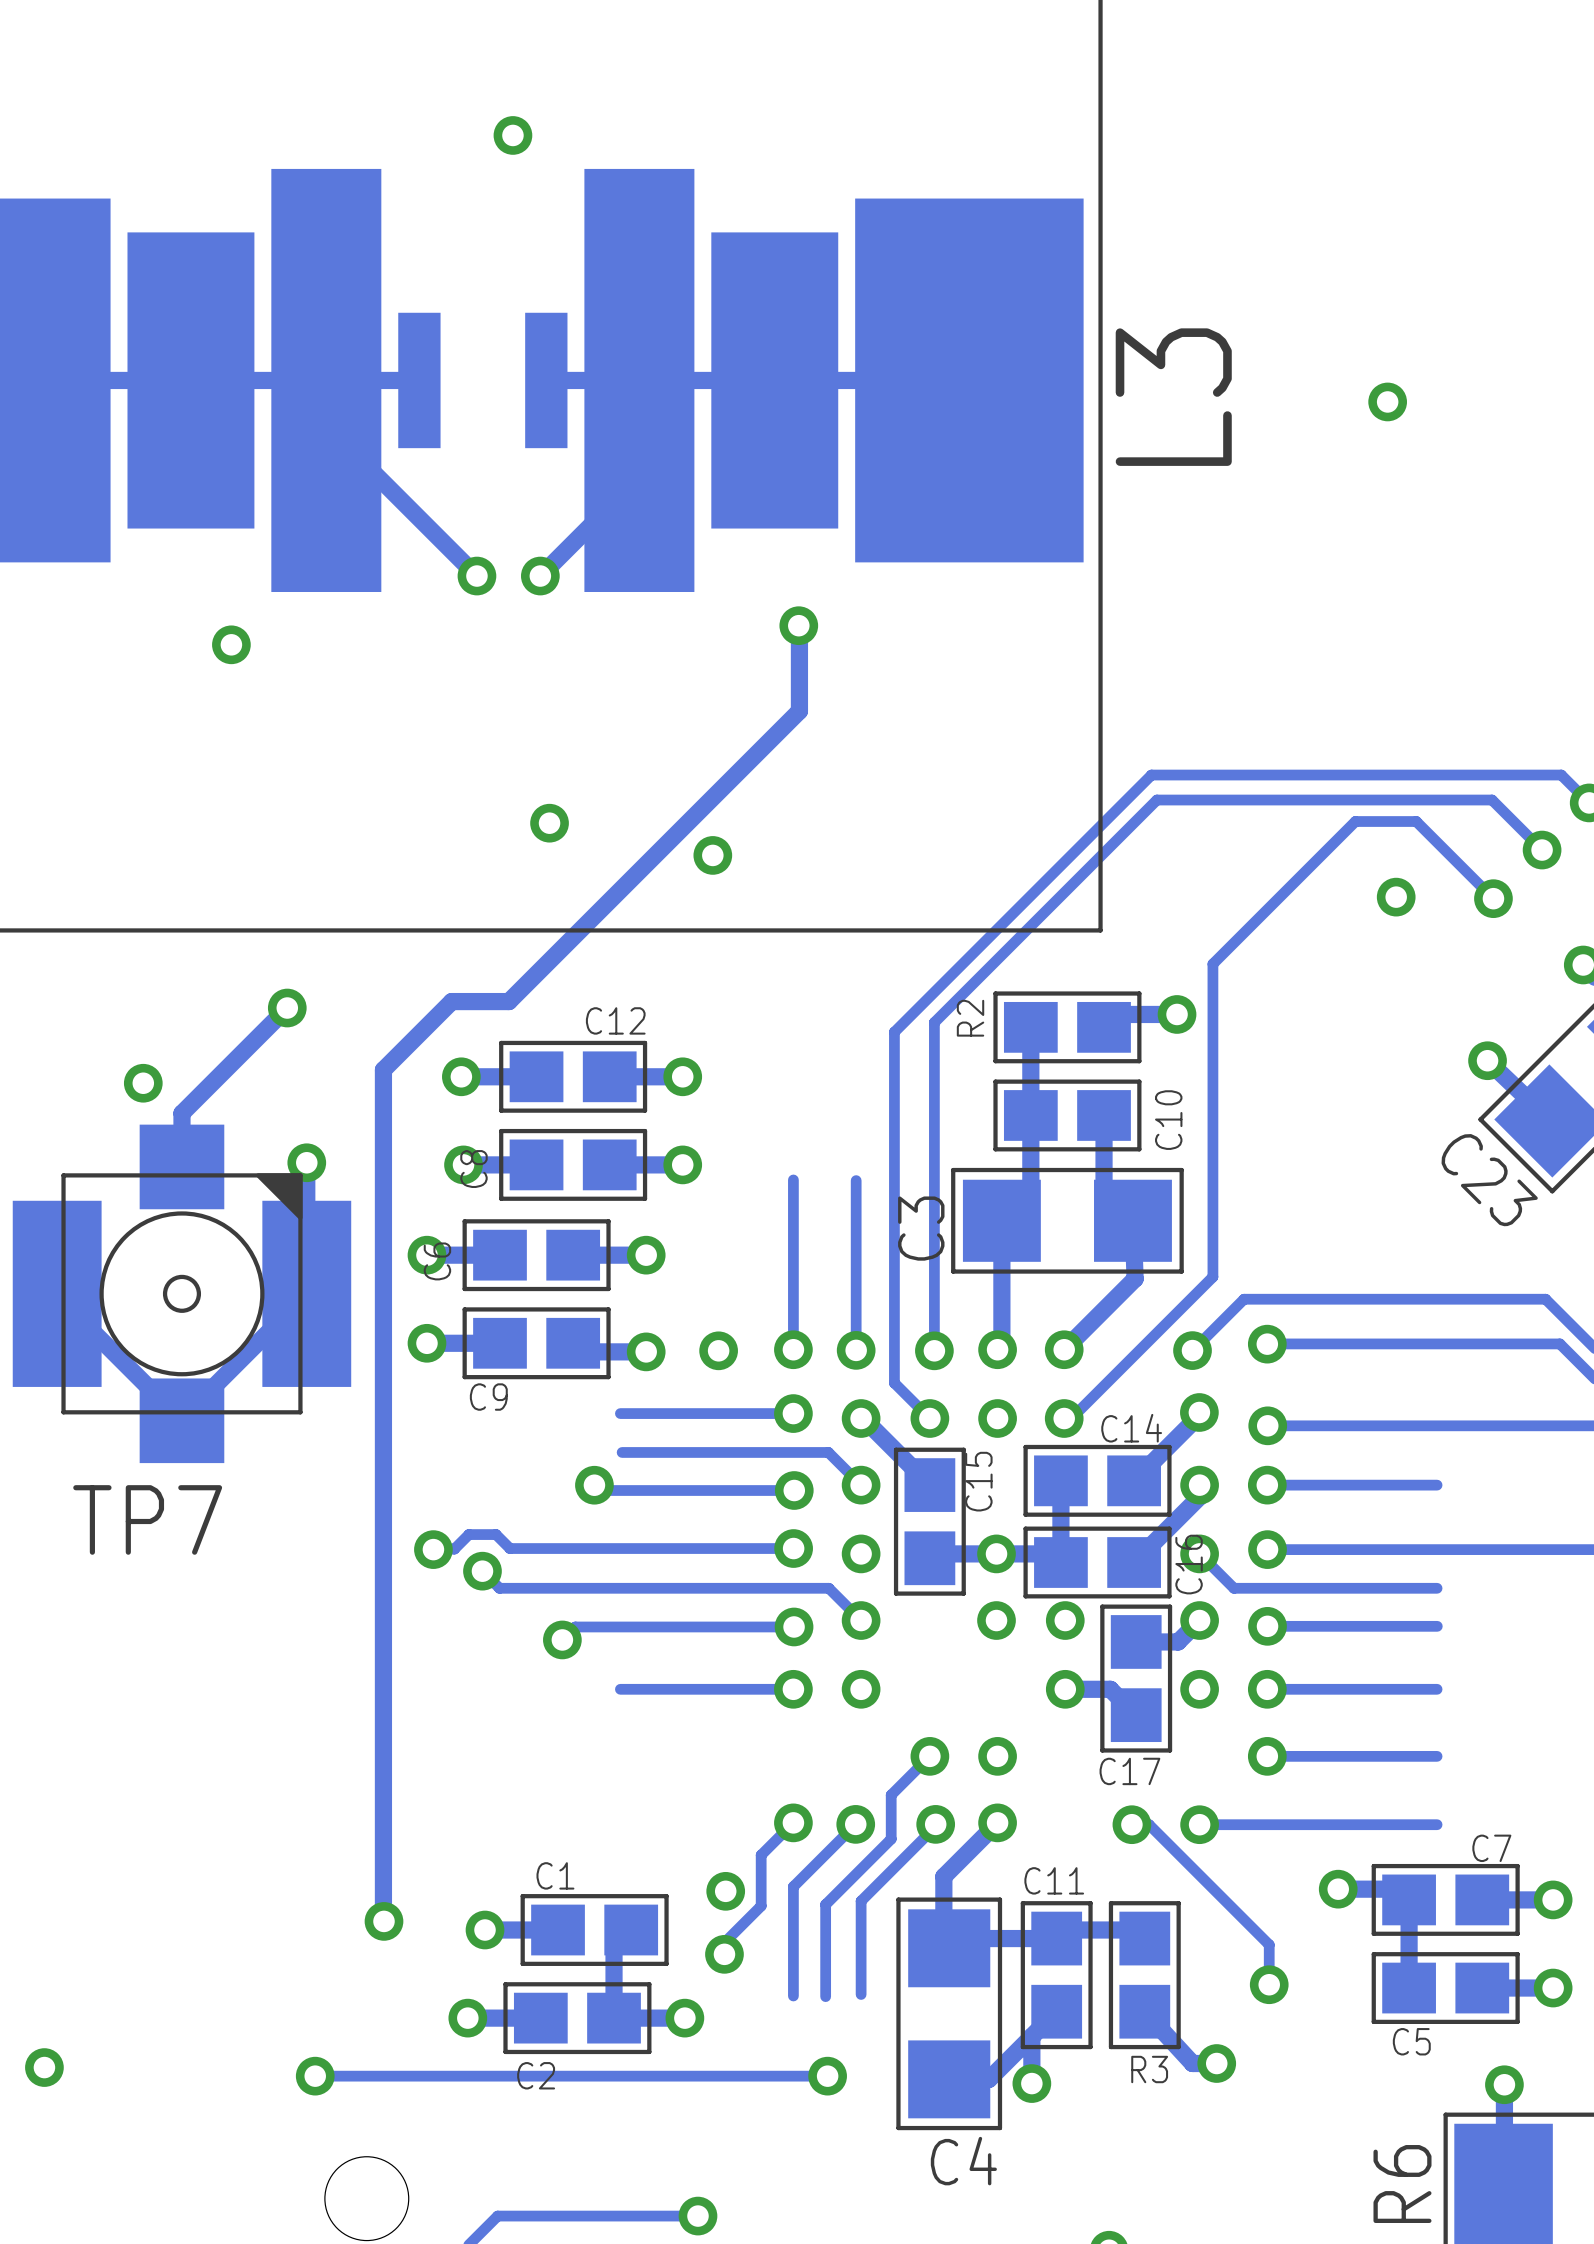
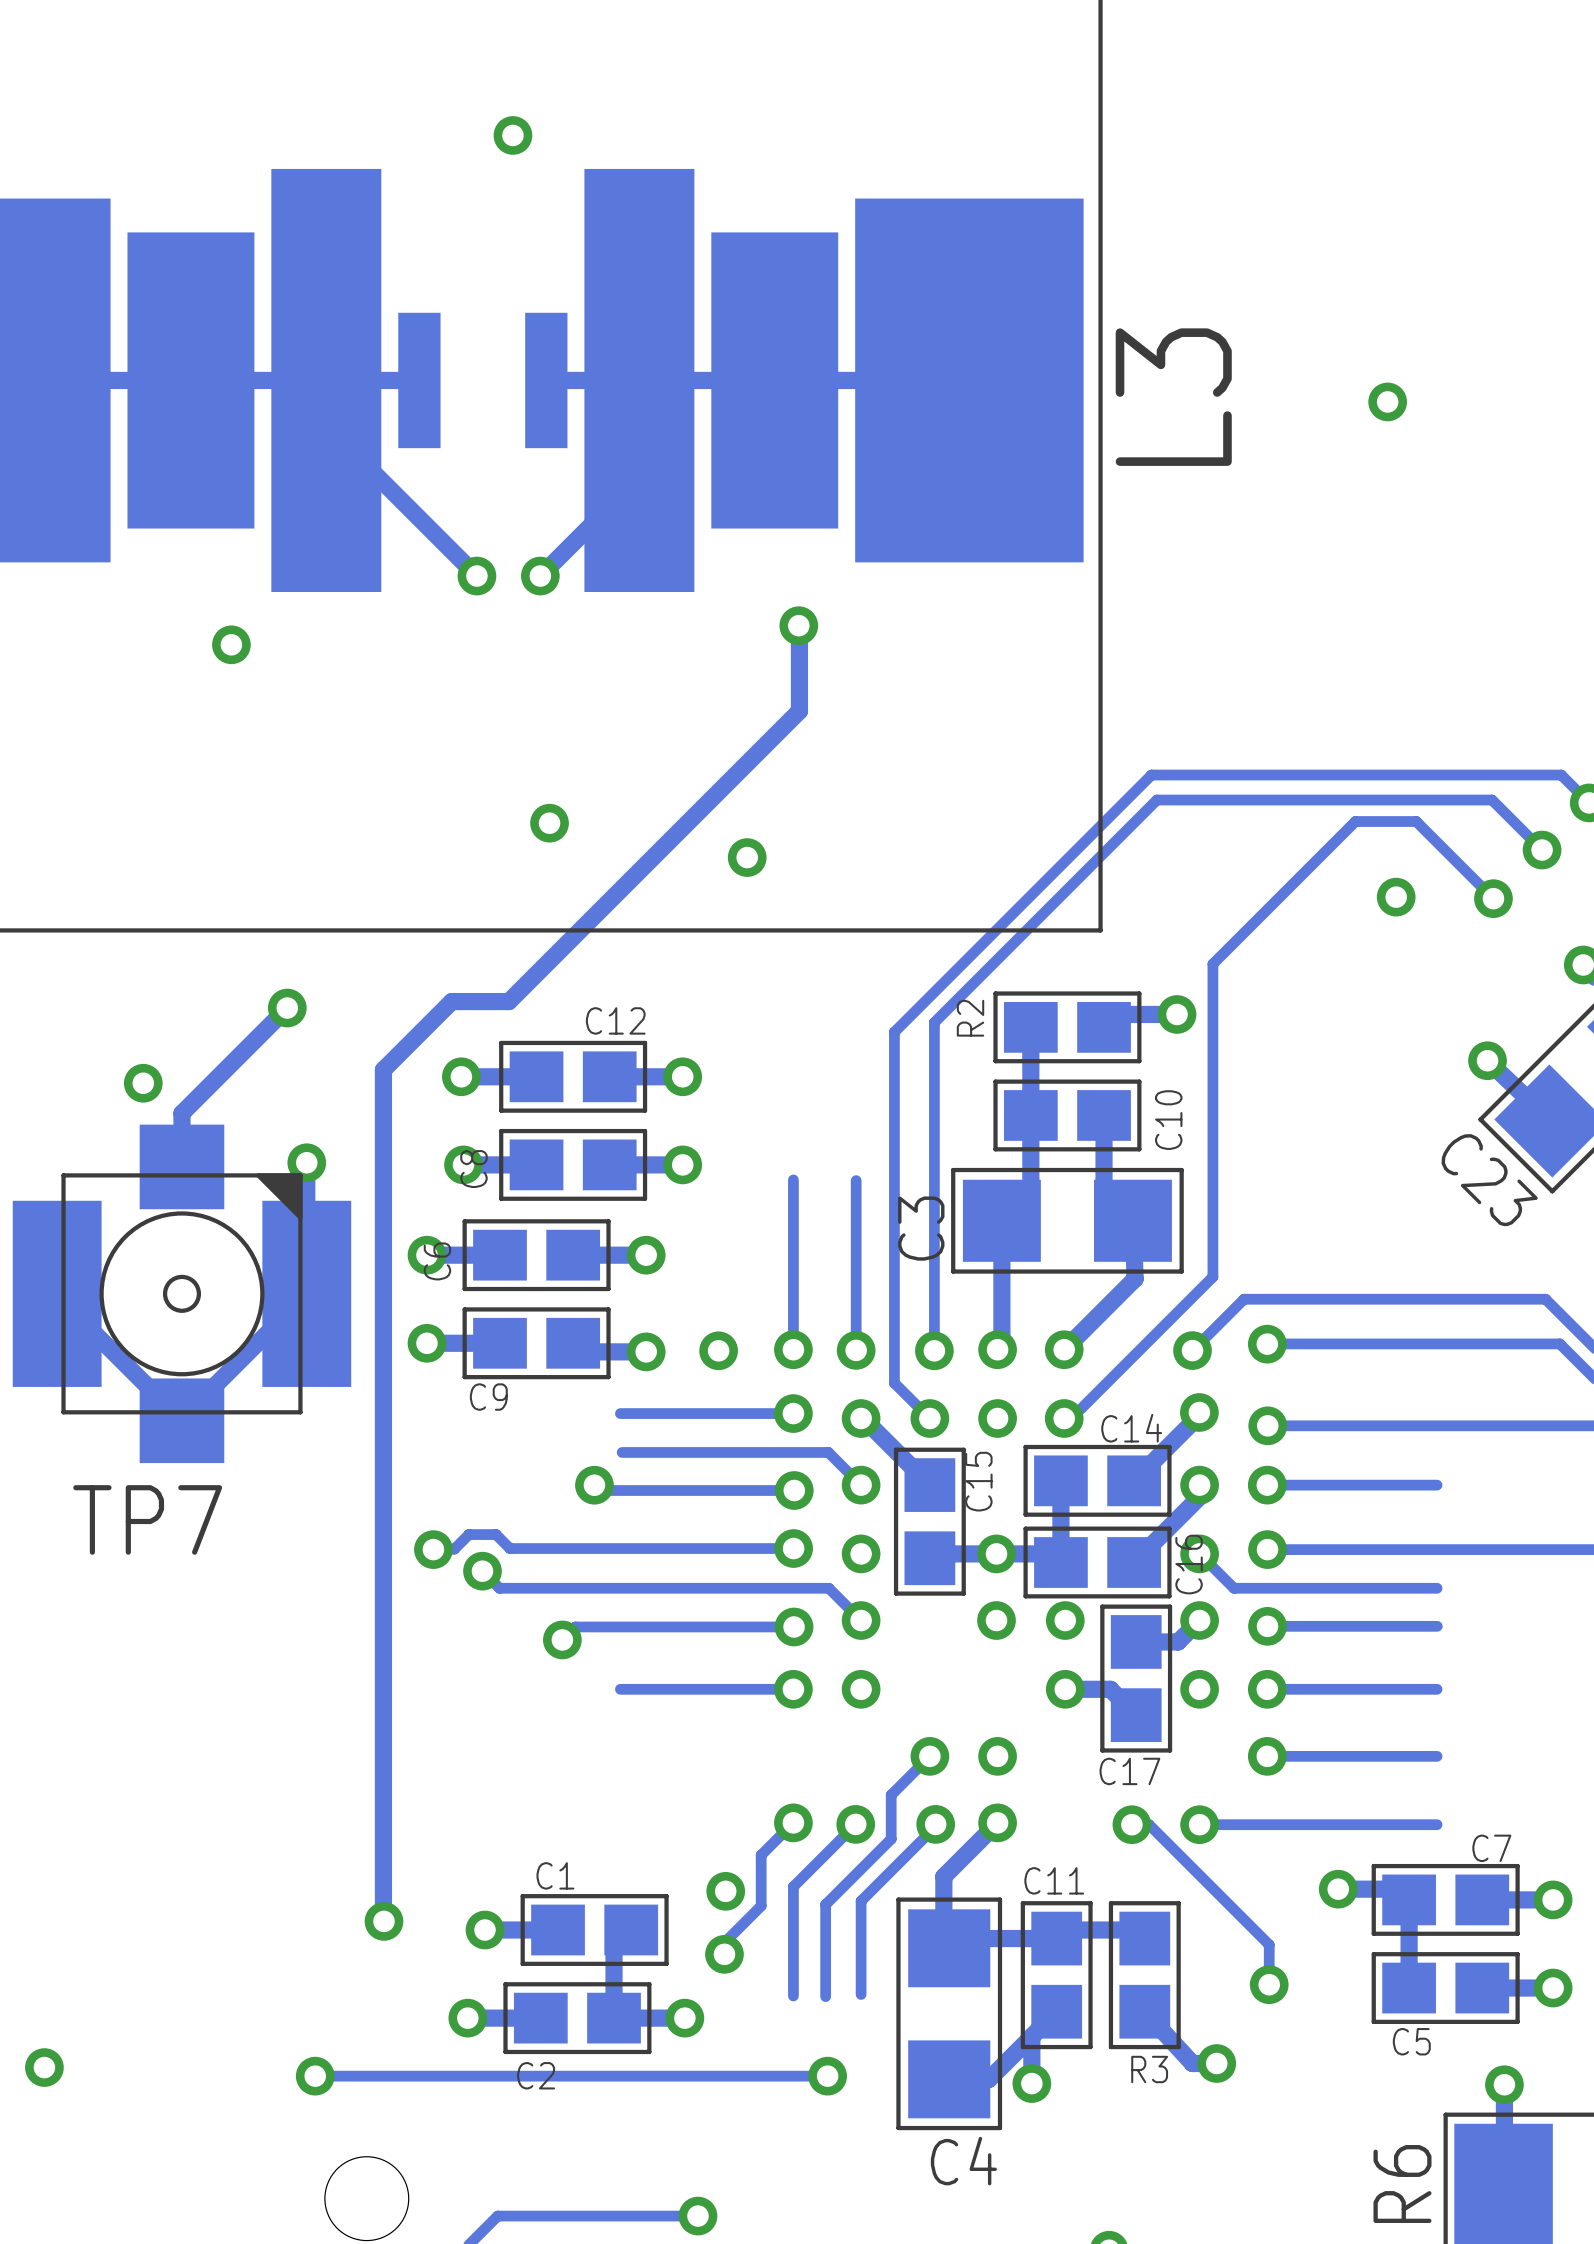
via position: (712, 855) -> (747, 857)

